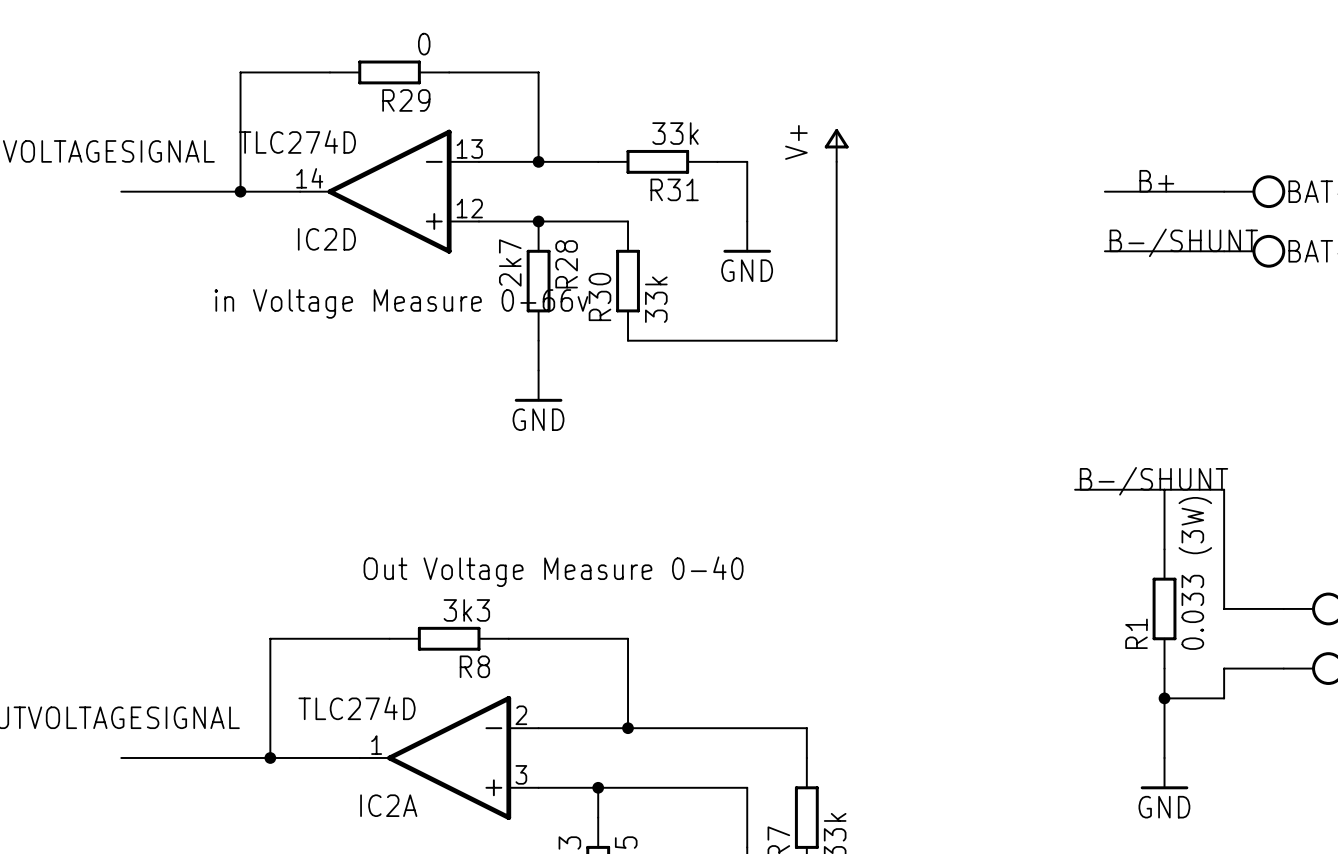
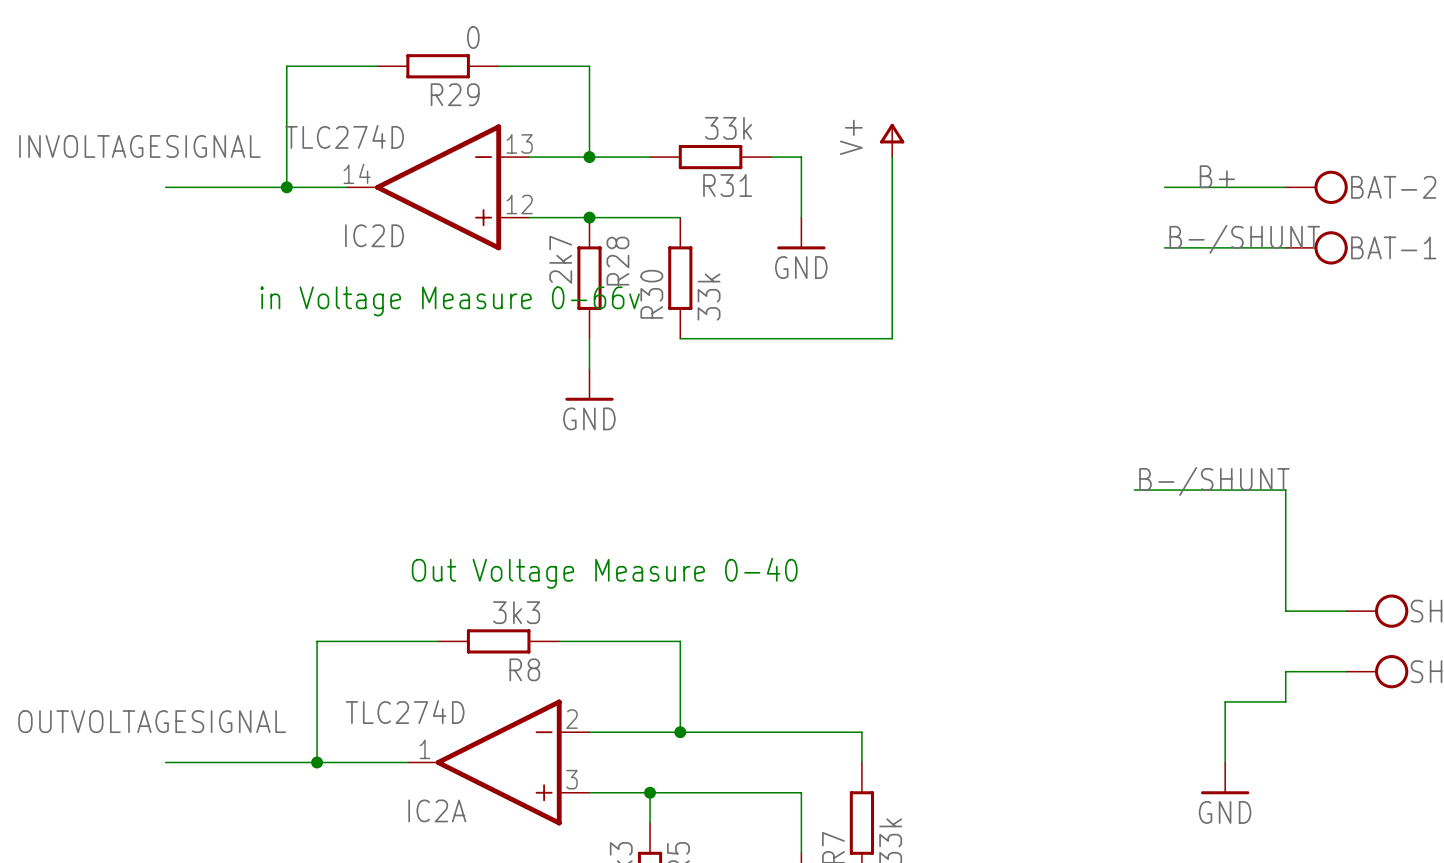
wire: (1164, 489) (1164, 549) -> none
R1: 0.033 (3W) (1164, 608) -> none
wire: (1164, 668) (1164, 698) -> none
junction: (1164, 698) -> none

